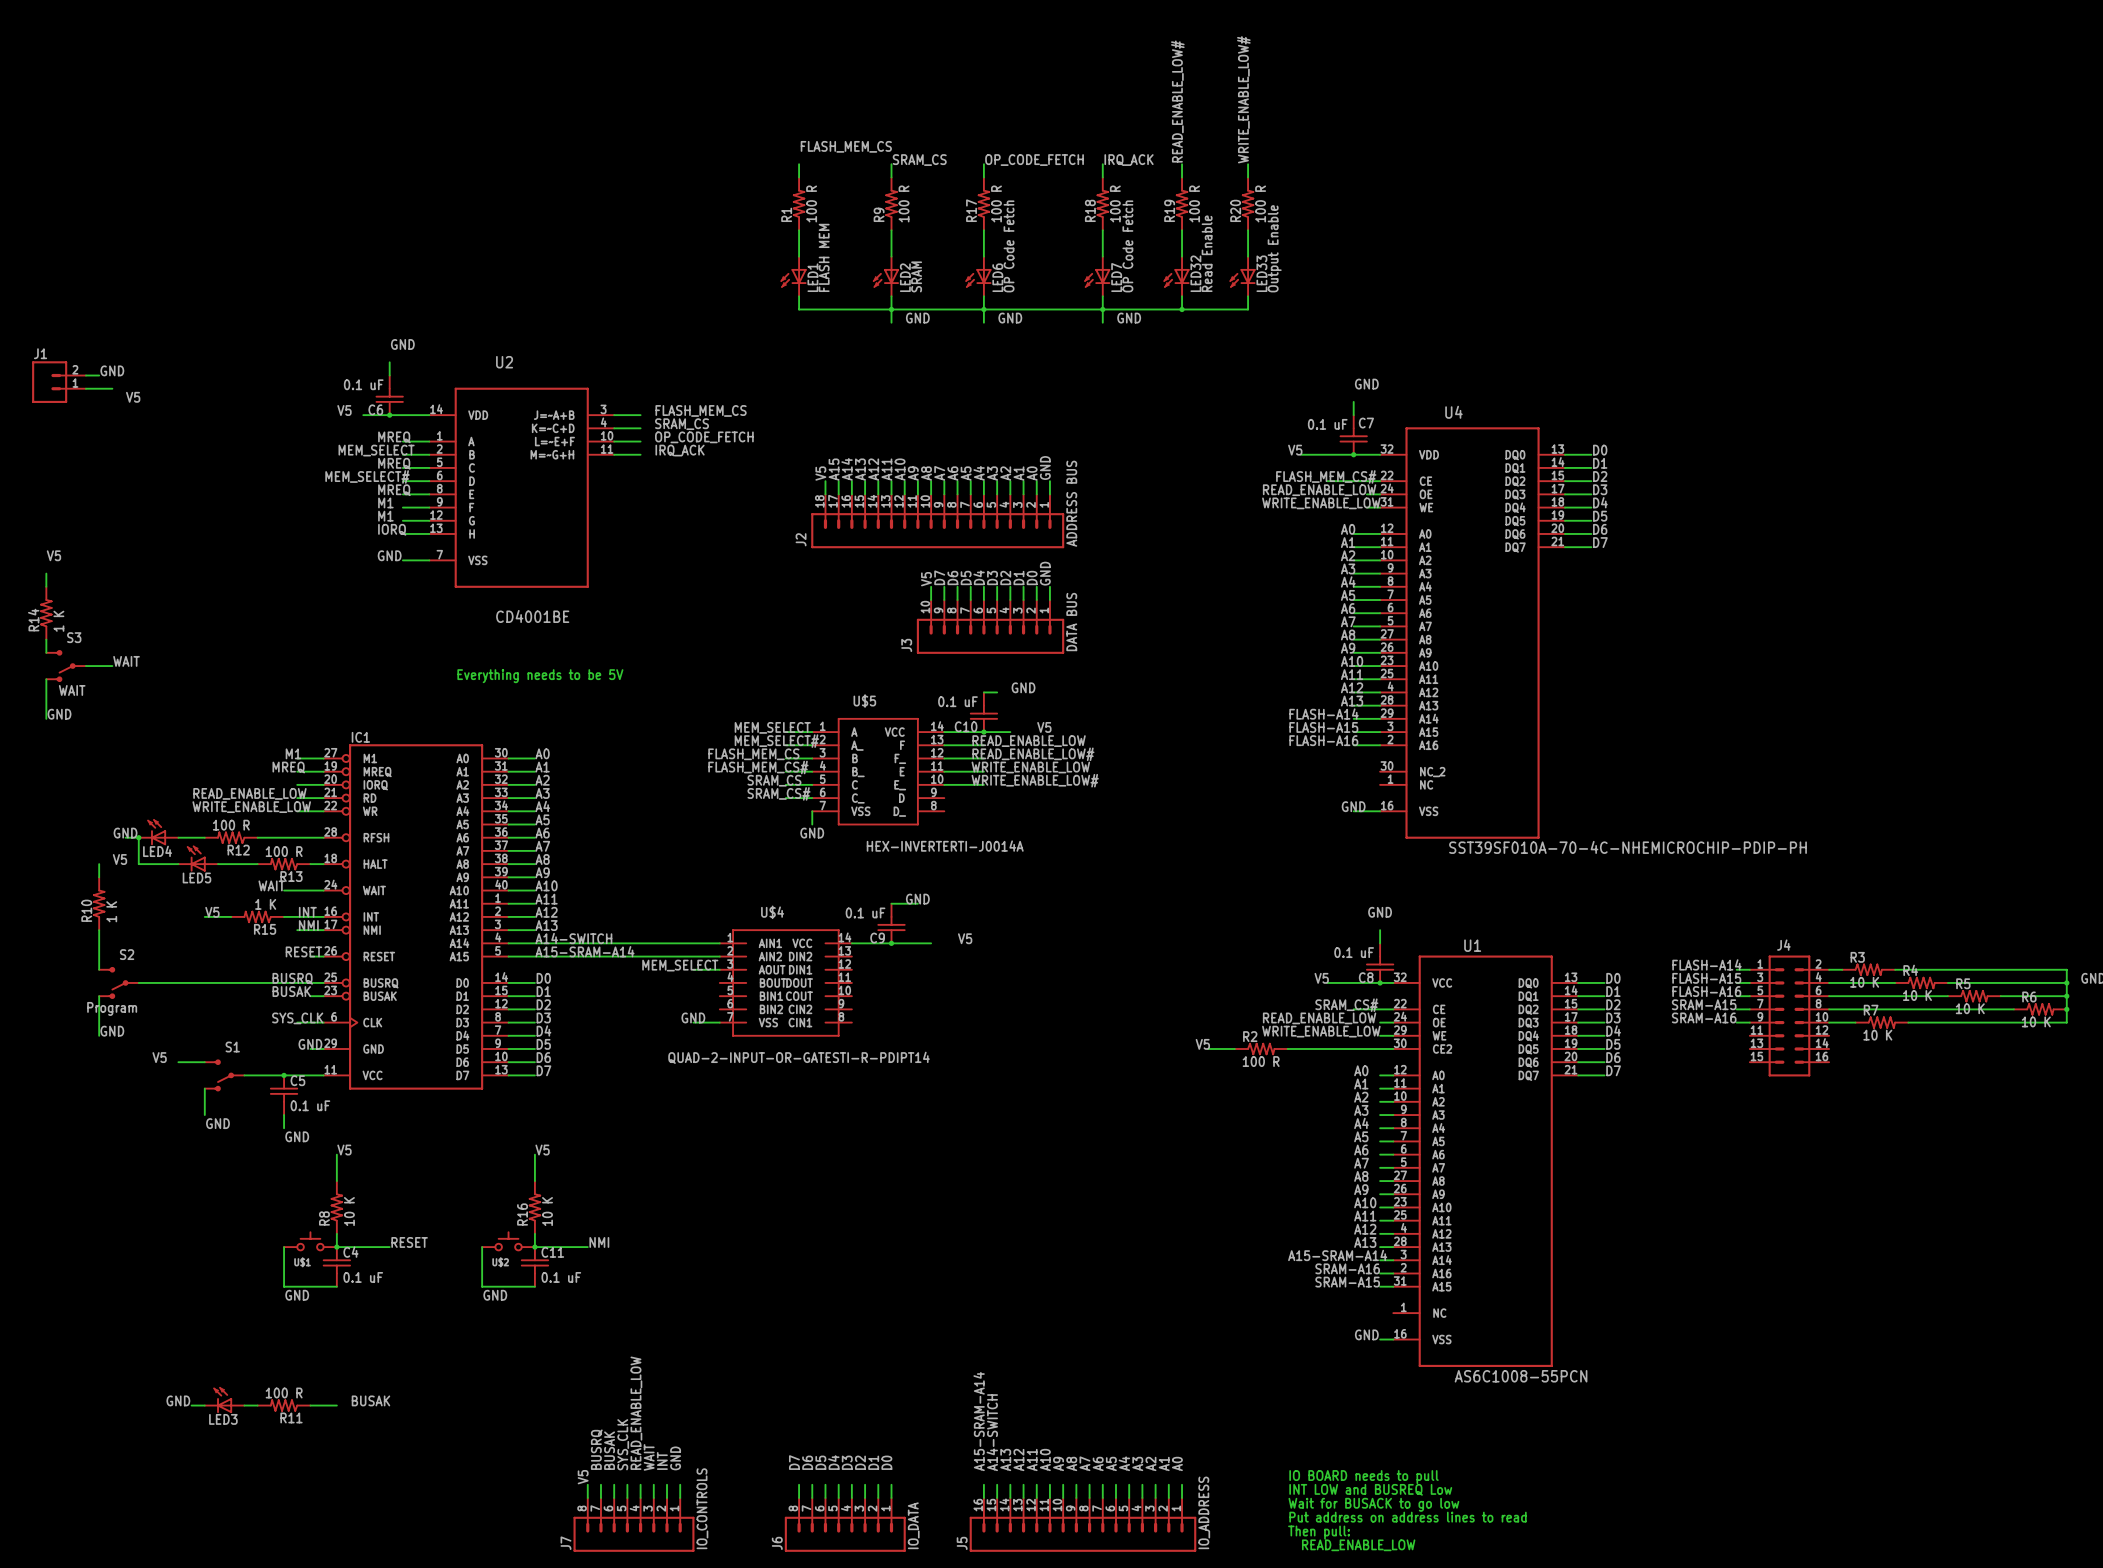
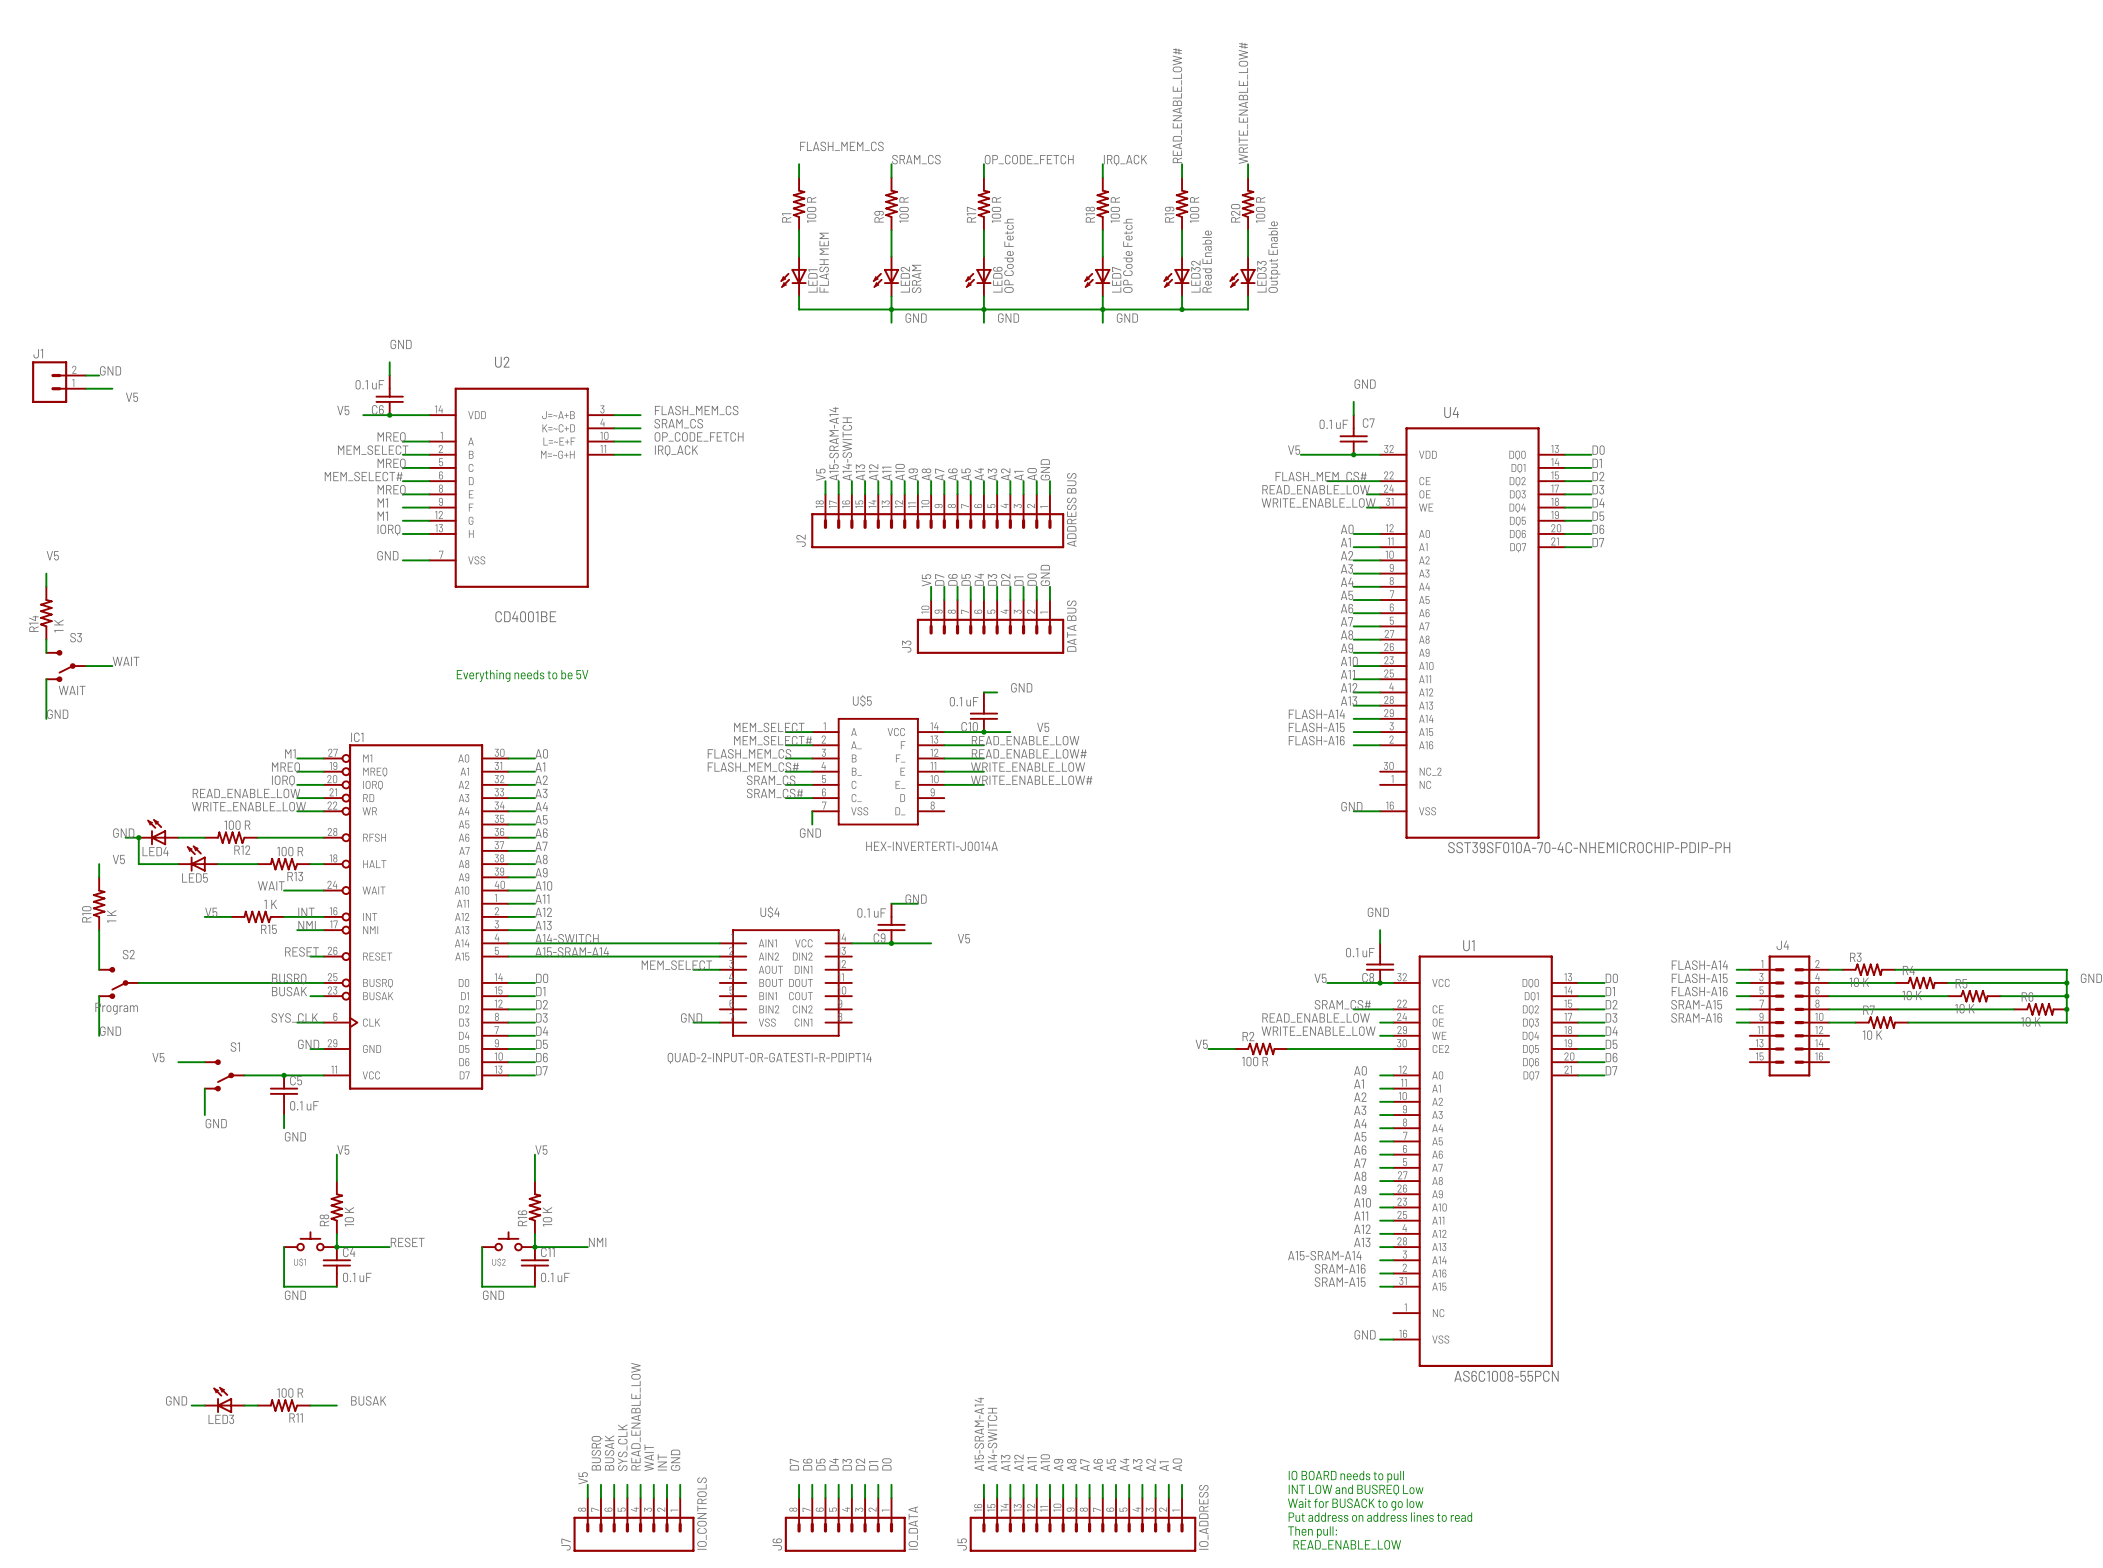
label: A15 (834, 469) -> A15-SRAM-A14 (834, 443)
label: A14 (847, 469) -> A14-SWITCH (847, 449)
label: none -> IORQ (283, 780)

